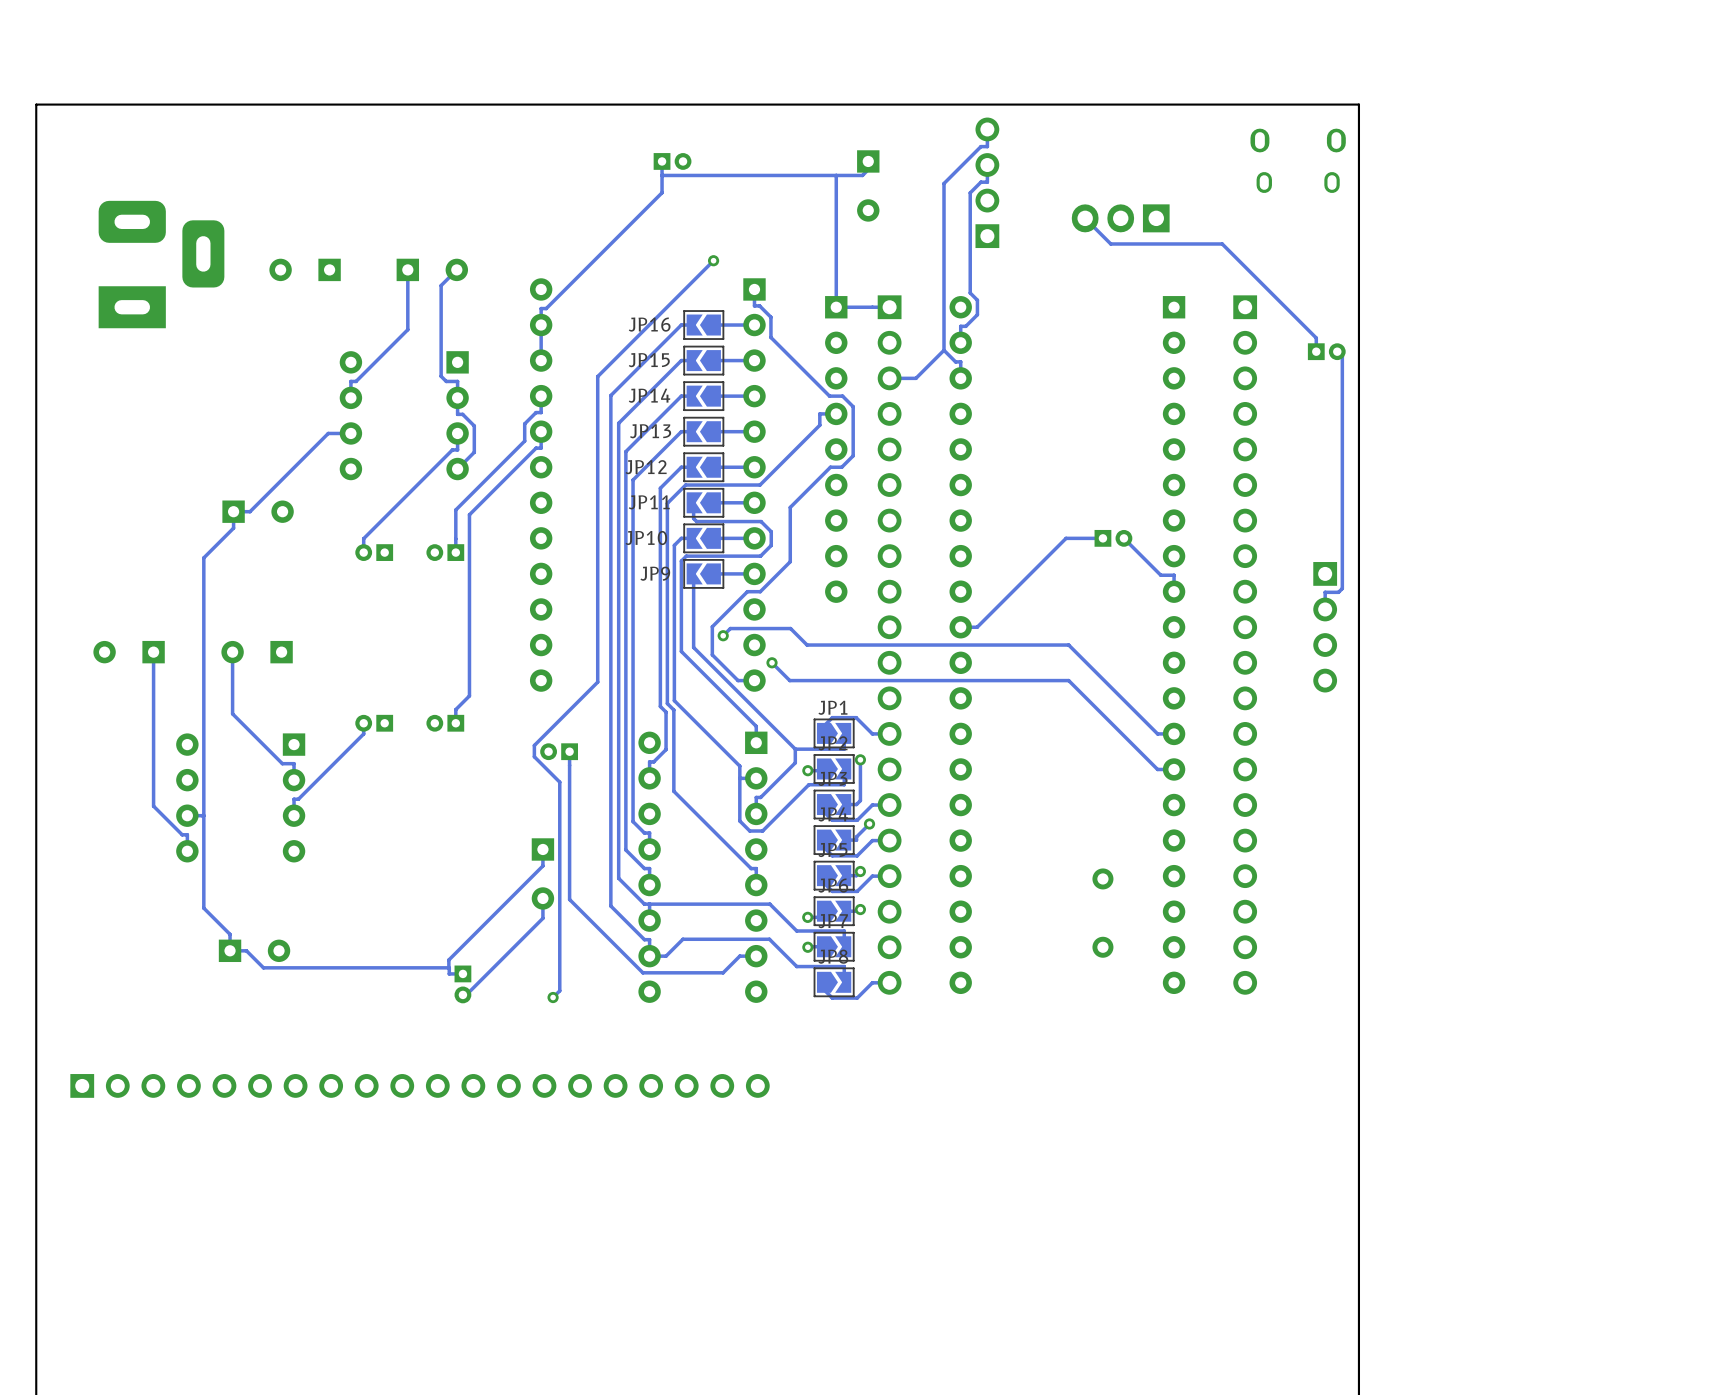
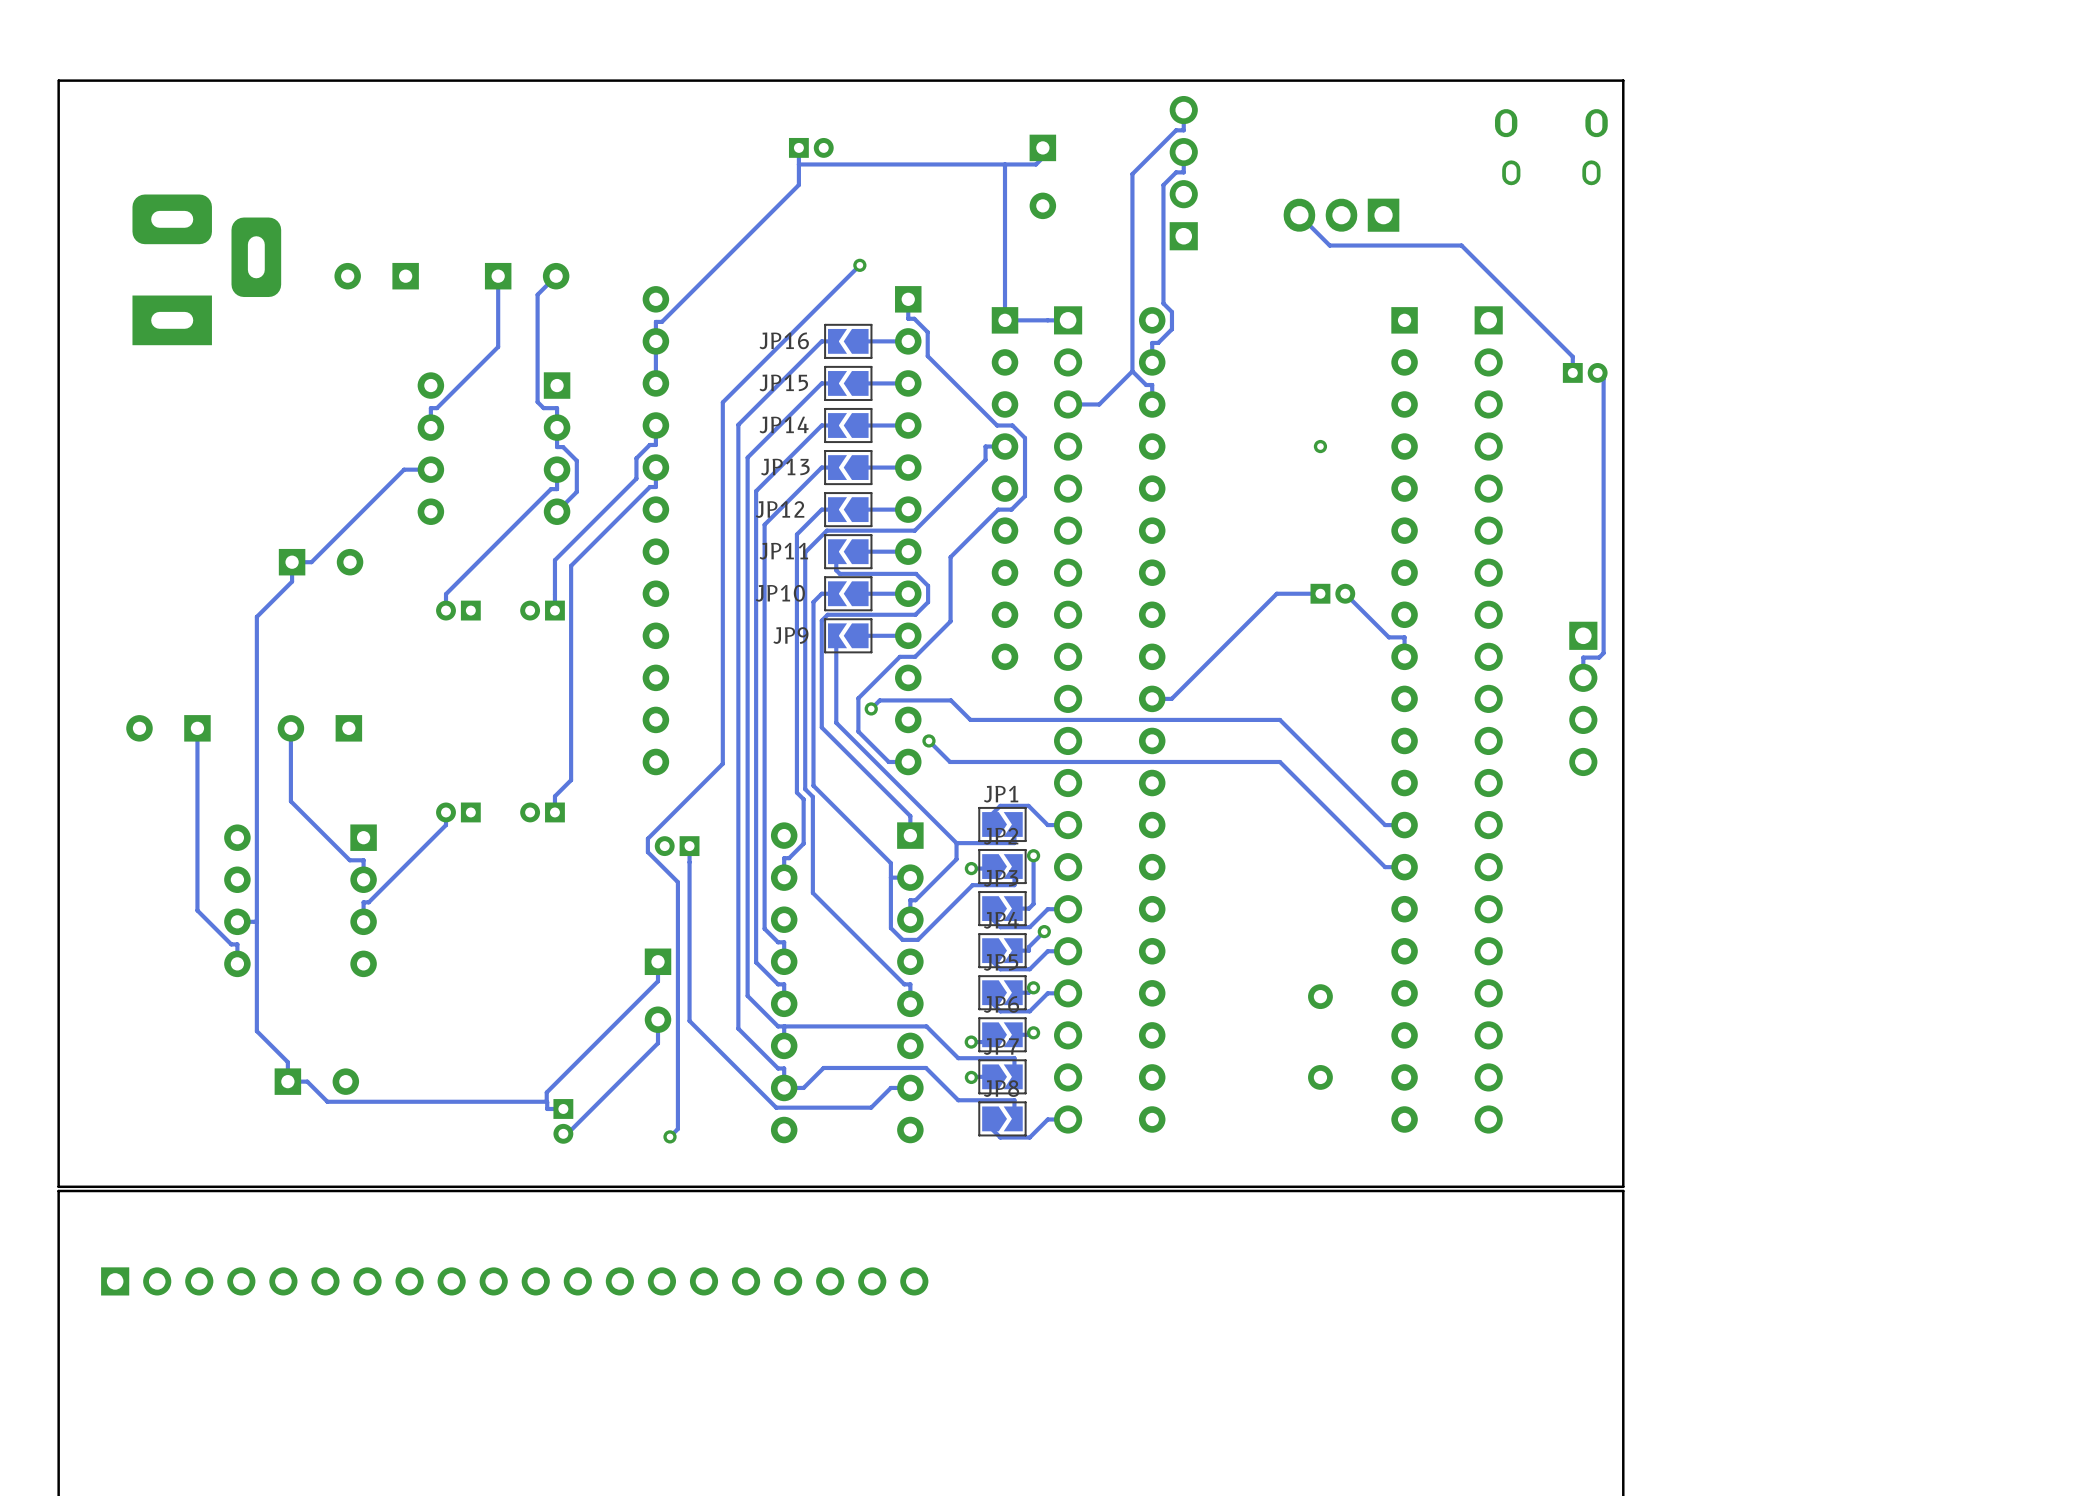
via: none -> (1320, 446)
board edge: (36, 1039) (36, 1043) -> (1623, 1190) (58, 1190)
board edge: (1358, 1039) (1358, 1043) -> (1623, 1186) (58, 1186)
part position: (420, 1085) -> (514, 1281)

